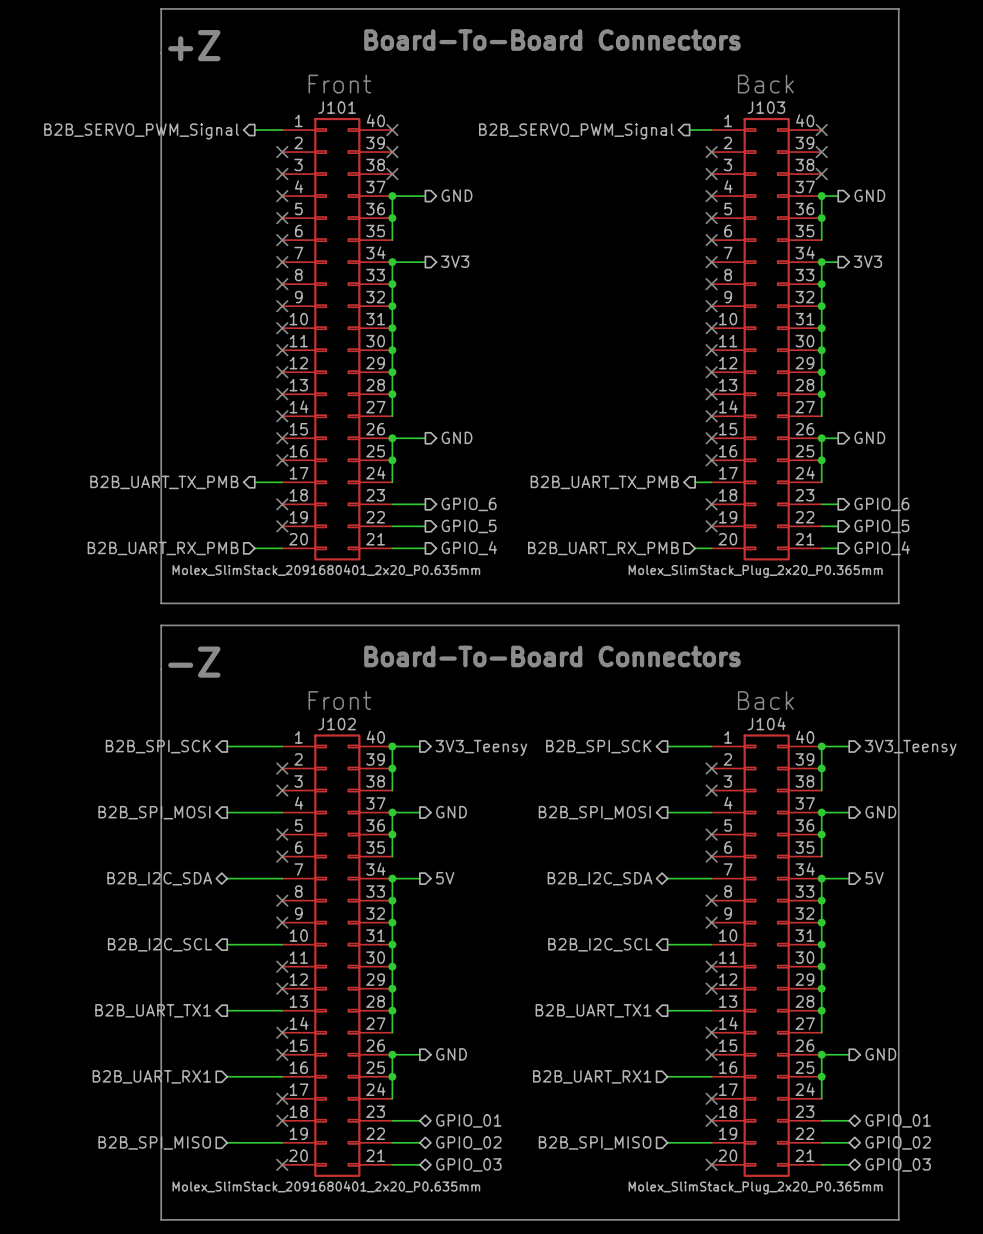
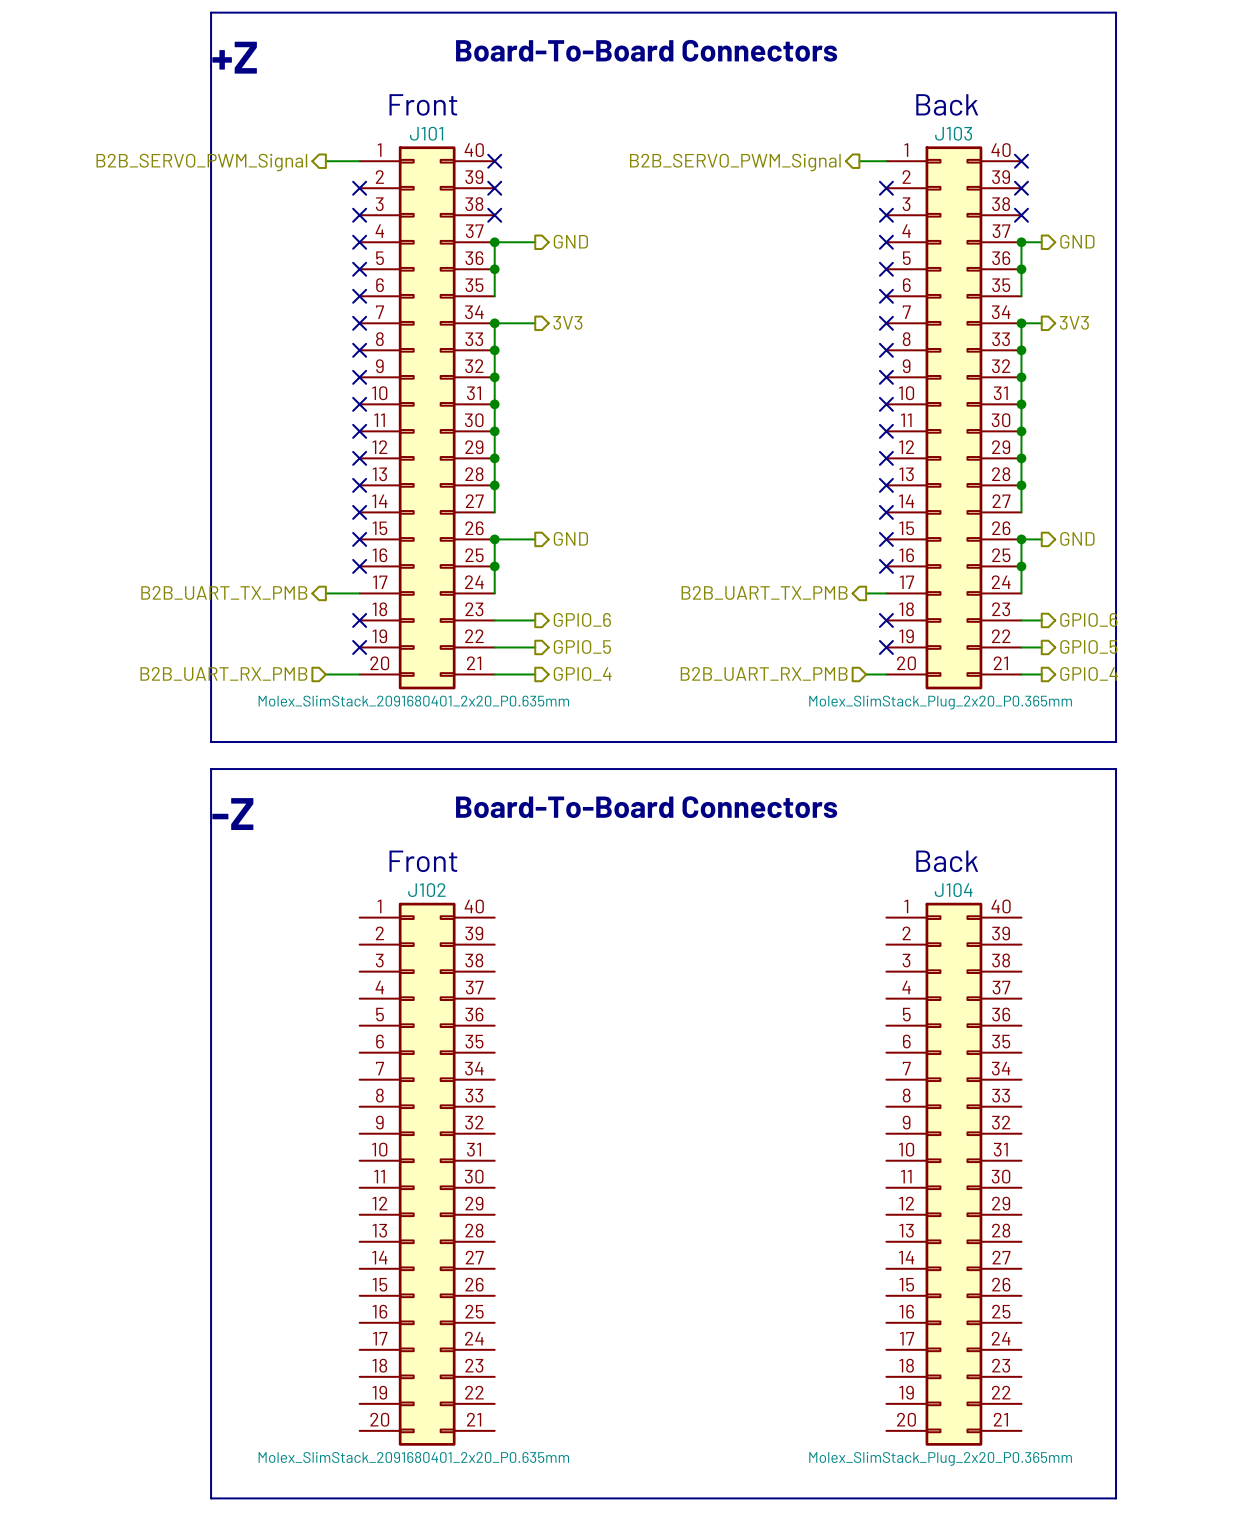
hierarchical label: B2B_SPI_SCK (158, 746) -> none
wire: (227, 746) (282, 746) -> none
junction: (392, 746) -> none
wire: (419, 746) (392, 746) (392, 790) -> none
hierarchical label: B2B_SPI_SCK (598, 746) -> none
wire: (667, 746) (711, 746) -> none
junction: (821, 746) -> none
wire: (849, 746) (821, 746) (821, 790) -> none
hierarchical label: 3V3_Teensy (481, 747) -> none
hierarchical label: 3V3_Teensy (910, 747) -> none
no-connect mark: (282, 768) -> none
junction: (392, 768) -> none
no-connect mark: (711, 768) -> none
junction: (821, 768) -> none
no-connect mark: (282, 790) -> none
no-connect mark: (711, 790) -> none
hierarchical label: B2B_SPI_MOSI (154, 812) -> none
wire: (227, 812) (282, 812) -> none
junction: (392, 812) -> none
wire: (419, 812) (392, 812) (392, 856) -> none
hierarchical label: GND (451, 812) -> none
hierarchical label: B2B_SPI_MOSI (594, 812) -> none
wire: (667, 812) (711, 812) -> none
junction: (821, 812) -> none
wire: (849, 812) (821, 812) (821, 856) -> none
hierarchical label: GND (880, 812) -> none
no-connect mark: (282, 834) -> none
junction: (392, 834) -> none
no-connect mark: (711, 834) -> none
junction: (821, 834) -> none
no-connect mark: (282, 856) -> none
no-connect mark: (711, 856) -> none
hierarchical label: B2B_I2C_SDA (159, 878) -> none
wire: (227, 878) (282, 878) -> none
junction: (392, 878) -> none
wire: (419, 878) (392, 878) (392, 1032) -> none
hierarchical label: 5V (445, 878) -> none
hierarchical label: B2B_I2C_SDA (600, 878) -> none
wire: (667, 878) (711, 878) -> none
junction: (821, 878) -> none
wire: (849, 878) (821, 878) (821, 1032) -> none
hierarchical label: 5V (874, 878) -> none
no-connect mark: (282, 900) -> none
junction: (392, 900) -> none
no-connect mark: (711, 900) -> none
junction: (821, 900) -> none
no-connect mark: (282, 922) -> none
junction: (392, 922) -> none
no-connect mark: (711, 922) -> none
junction: (821, 922) -> none
hierarchical label: B2B_I2C_SCL (159, 944) -> none
wire: (227, 944) (282, 944) -> none
junction: (392, 944) -> none
hierarchical label: B2B_I2C_SCL (600, 944) -> none
wire: (667, 944) (711, 944) -> none
junction: (821, 944) -> none
no-connect mark: (282, 966) -> none
junction: (392, 966) -> none
no-connect mark: (711, 966) -> none
junction: (821, 966) -> none
no-connect mark: (282, 988) -> none
junction: (392, 988) -> none
no-connect mark: (711, 988) -> none
junction: (821, 988) -> none
hierarchical label: B2B_UART_TX1 (153, 1010) -> none
wire: (227, 1010) (282, 1010) -> none
junction: (392, 1010) -> none
hierarchical label: B2B_UART_TX1 (593, 1010) -> none
wire: (667, 1010) (711, 1010) -> none
junction: (821, 1010) -> none
no-connect mark: (282, 1032) -> none
no-connect mark: (711, 1032) -> none
no-connect mark: (282, 1054) -> none
junction: (392, 1054) -> none
wire: (419, 1054) (392, 1054) (392, 1098) -> none
hierarchical label: GND (451, 1054) -> none
no-connect mark: (711, 1054) -> none
junction: (821, 1054) -> none
wire: (849, 1054) (821, 1054) (821, 1098) -> none
hierarchical label: GND (880, 1054) -> none
hierarchical label: B2B_UART_RX1 (151, 1076) -> none
wire: (227, 1076) (282, 1076) -> none
junction: (392, 1076) -> none
hierarchical label: B2B_UART_RX1 (592, 1076) -> none
wire: (667, 1076) (711, 1076) -> none
junction: (821, 1076) -> none
no-connect mark: (282, 1098) -> none
no-connect mark: (711, 1098) -> none
no-connect mark: (282, 1120) -> none
wire: (392, 1120) (419, 1120) -> none
hierarchical label: GPIO_01 (468, 1120) -> none
no-connect mark: (711, 1120) -> none
wire: (821, 1120) (849, 1120) -> none
hierarchical label: GPIO_01 (898, 1120) -> none
hierarchical label: B2B_SPI_MISO (154, 1142) -> none
wire: (227, 1142) (282, 1142) -> none
wire: (392, 1142) (419, 1142) -> none
hierarchical label: GPIO_02 (468, 1142) -> none
hierarchical label: B2B_SPI_MISO (595, 1142) -> none
wire: (667, 1142) (711, 1142) -> none
wire: (821, 1142) (849, 1142) -> none
hierarchical label: GPIO_02 (898, 1142) -> none
no-connect mark: (282, 1164) -> none
wire: (392, 1164) (419, 1164) -> none
hierarchical label: GPIO_03 (468, 1164) -> none
no-connect mark: (711, 1164) -> none
wire: (821, 1164) (849, 1164) -> none
hierarchical label: GPIO_03 (898, 1164) -> none

